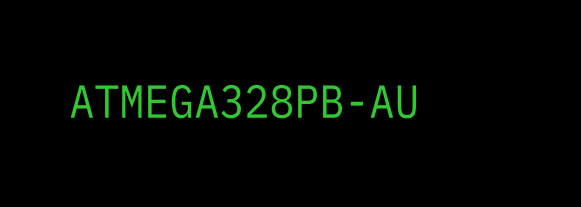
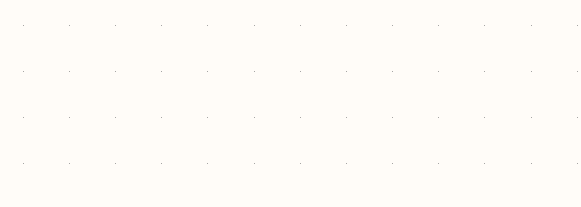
text: ATMEGA328PB-AU (243, 101) -> none

